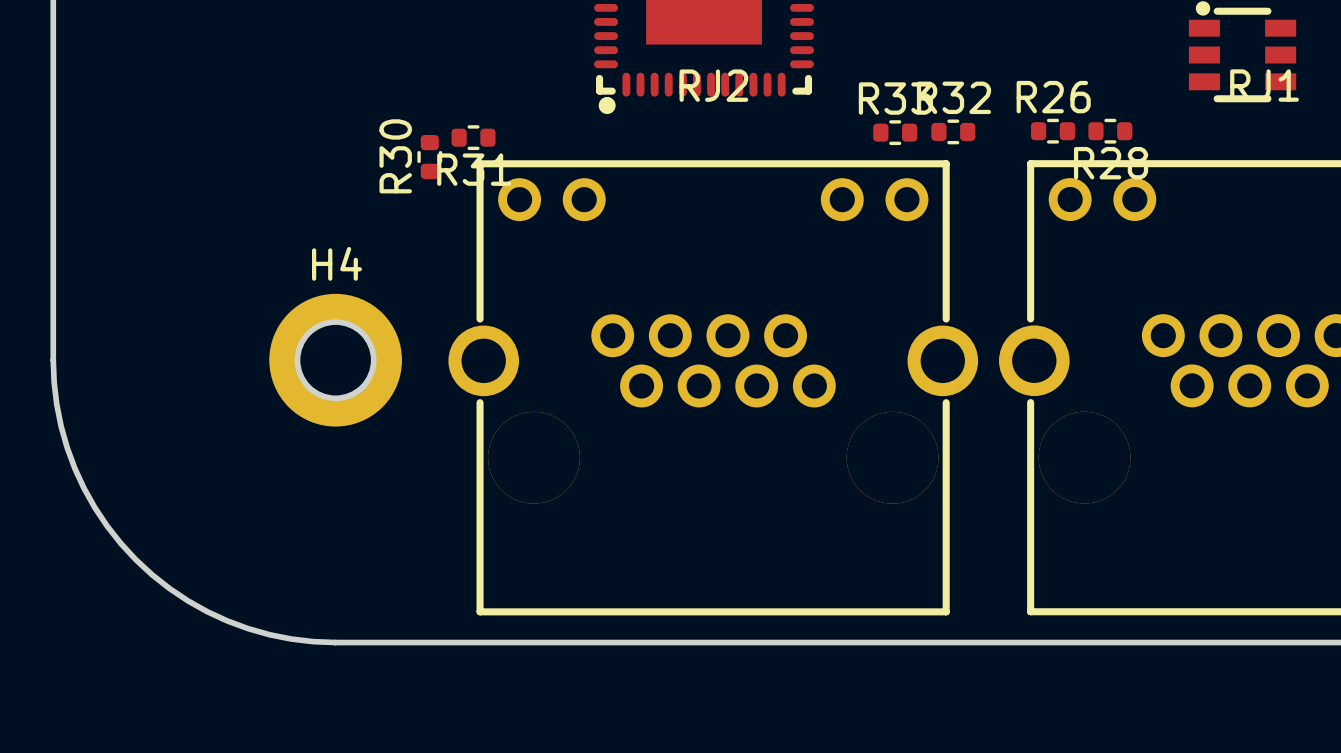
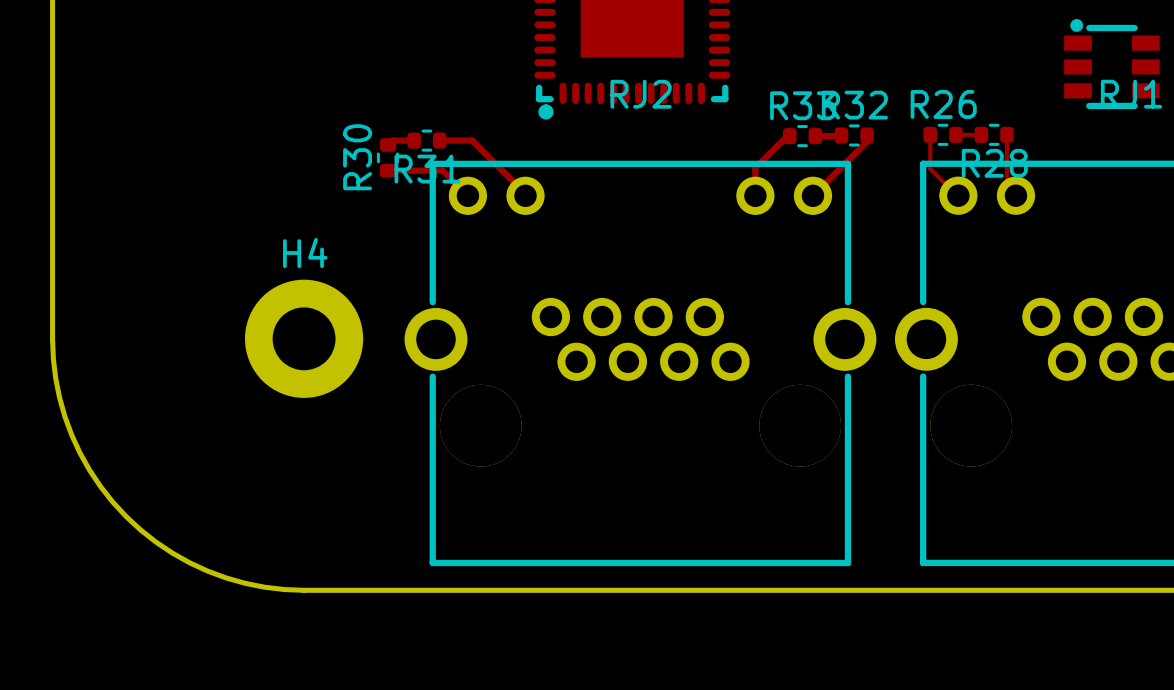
track: none -> (787, 135) (755, 167) (755, 195)
track: none -> (867, 135) (867, 141) (812, 195)
track: none -> (930, 134) (930, 168) (957, 196) (960, 196)
track: none -> (955, 134) (982, 135)
track: none -> (1007, 134) (1007, 185) (1017, 196)
track: none -> (815, 136) (840, 136)
track: none -> (414, 140) (392, 140) (388, 144)
track: none -> (439, 140) (472, 140) (526, 194)
track: none -> (387, 170) (442, 170) (468, 196)

